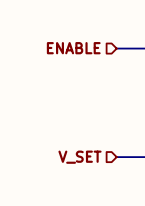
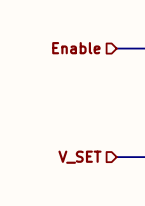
hierarchical label: ENABLE (73, 48) -> Enable (76, 48)

